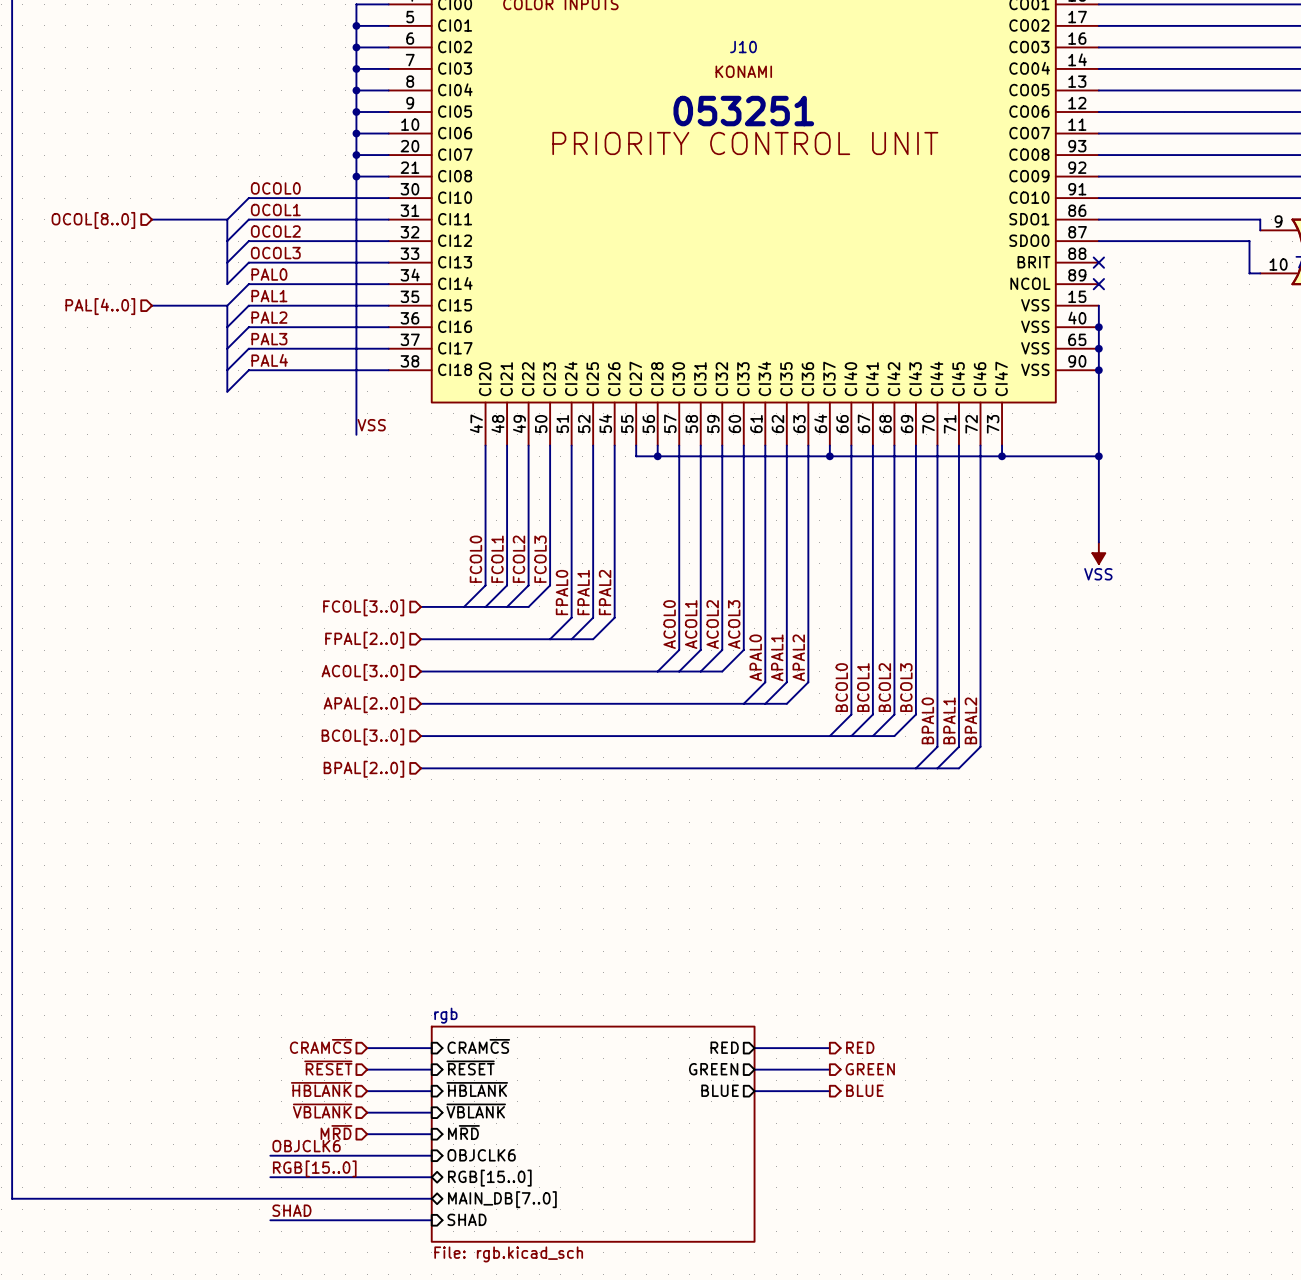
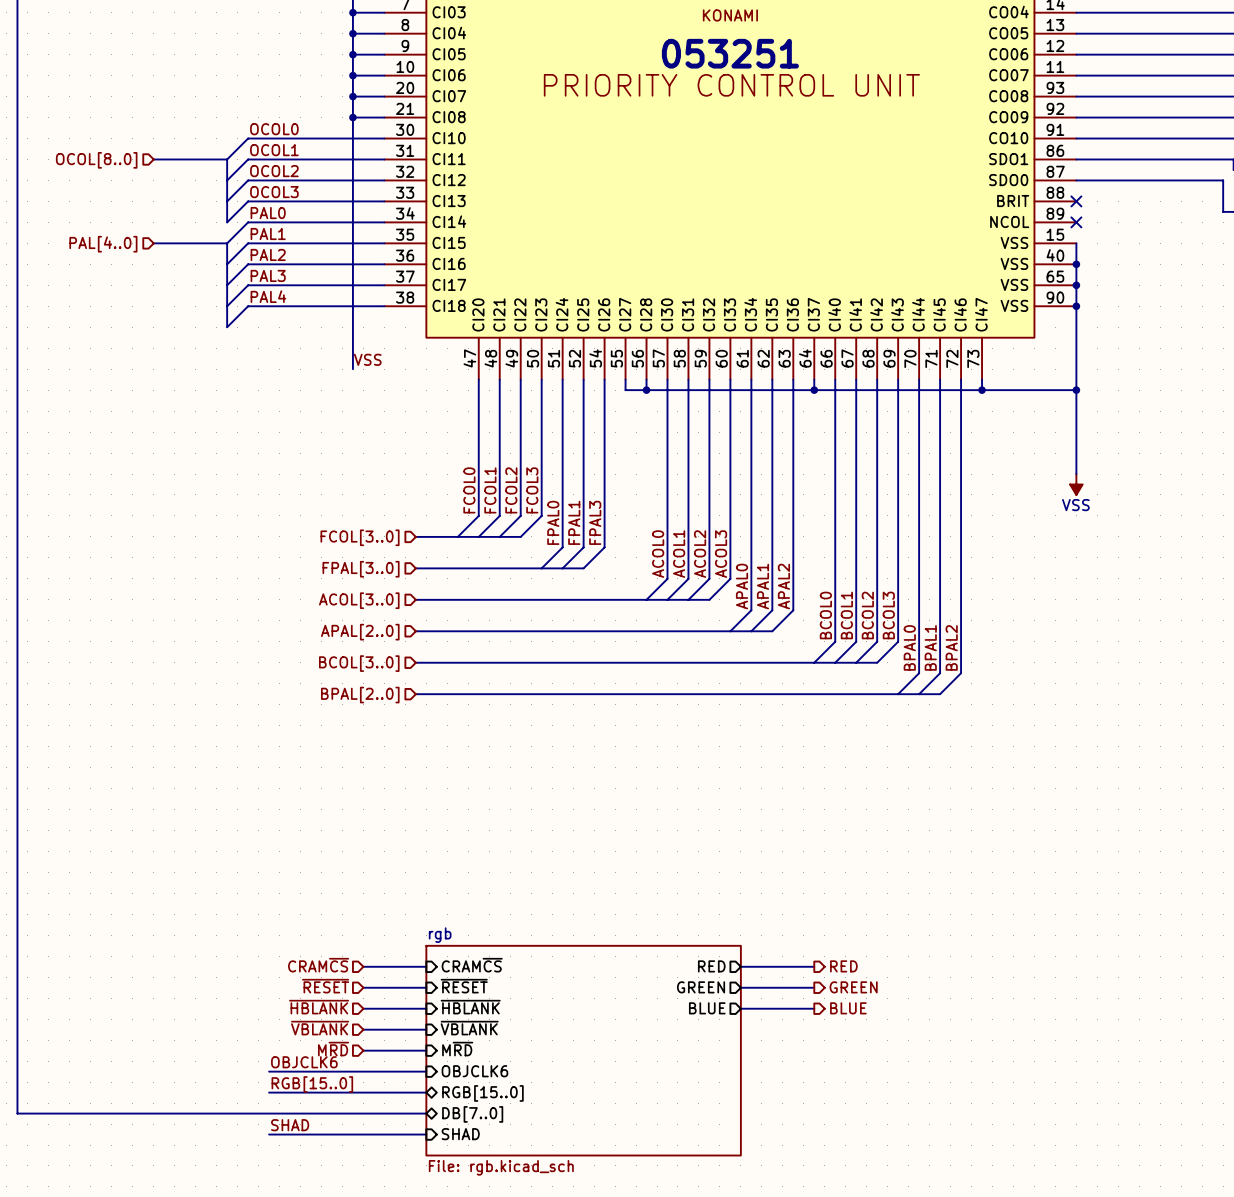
label: FPAL2 (605, 592) -> FPAL3 (595, 522)
hierarchical label: FPAL[2..0] (364, 640) -> FPAL[3..0] (361, 569)
sheet pin: MAIN_DB[7..0] (502, 1199) -> DB[7..0] (472, 1114)

